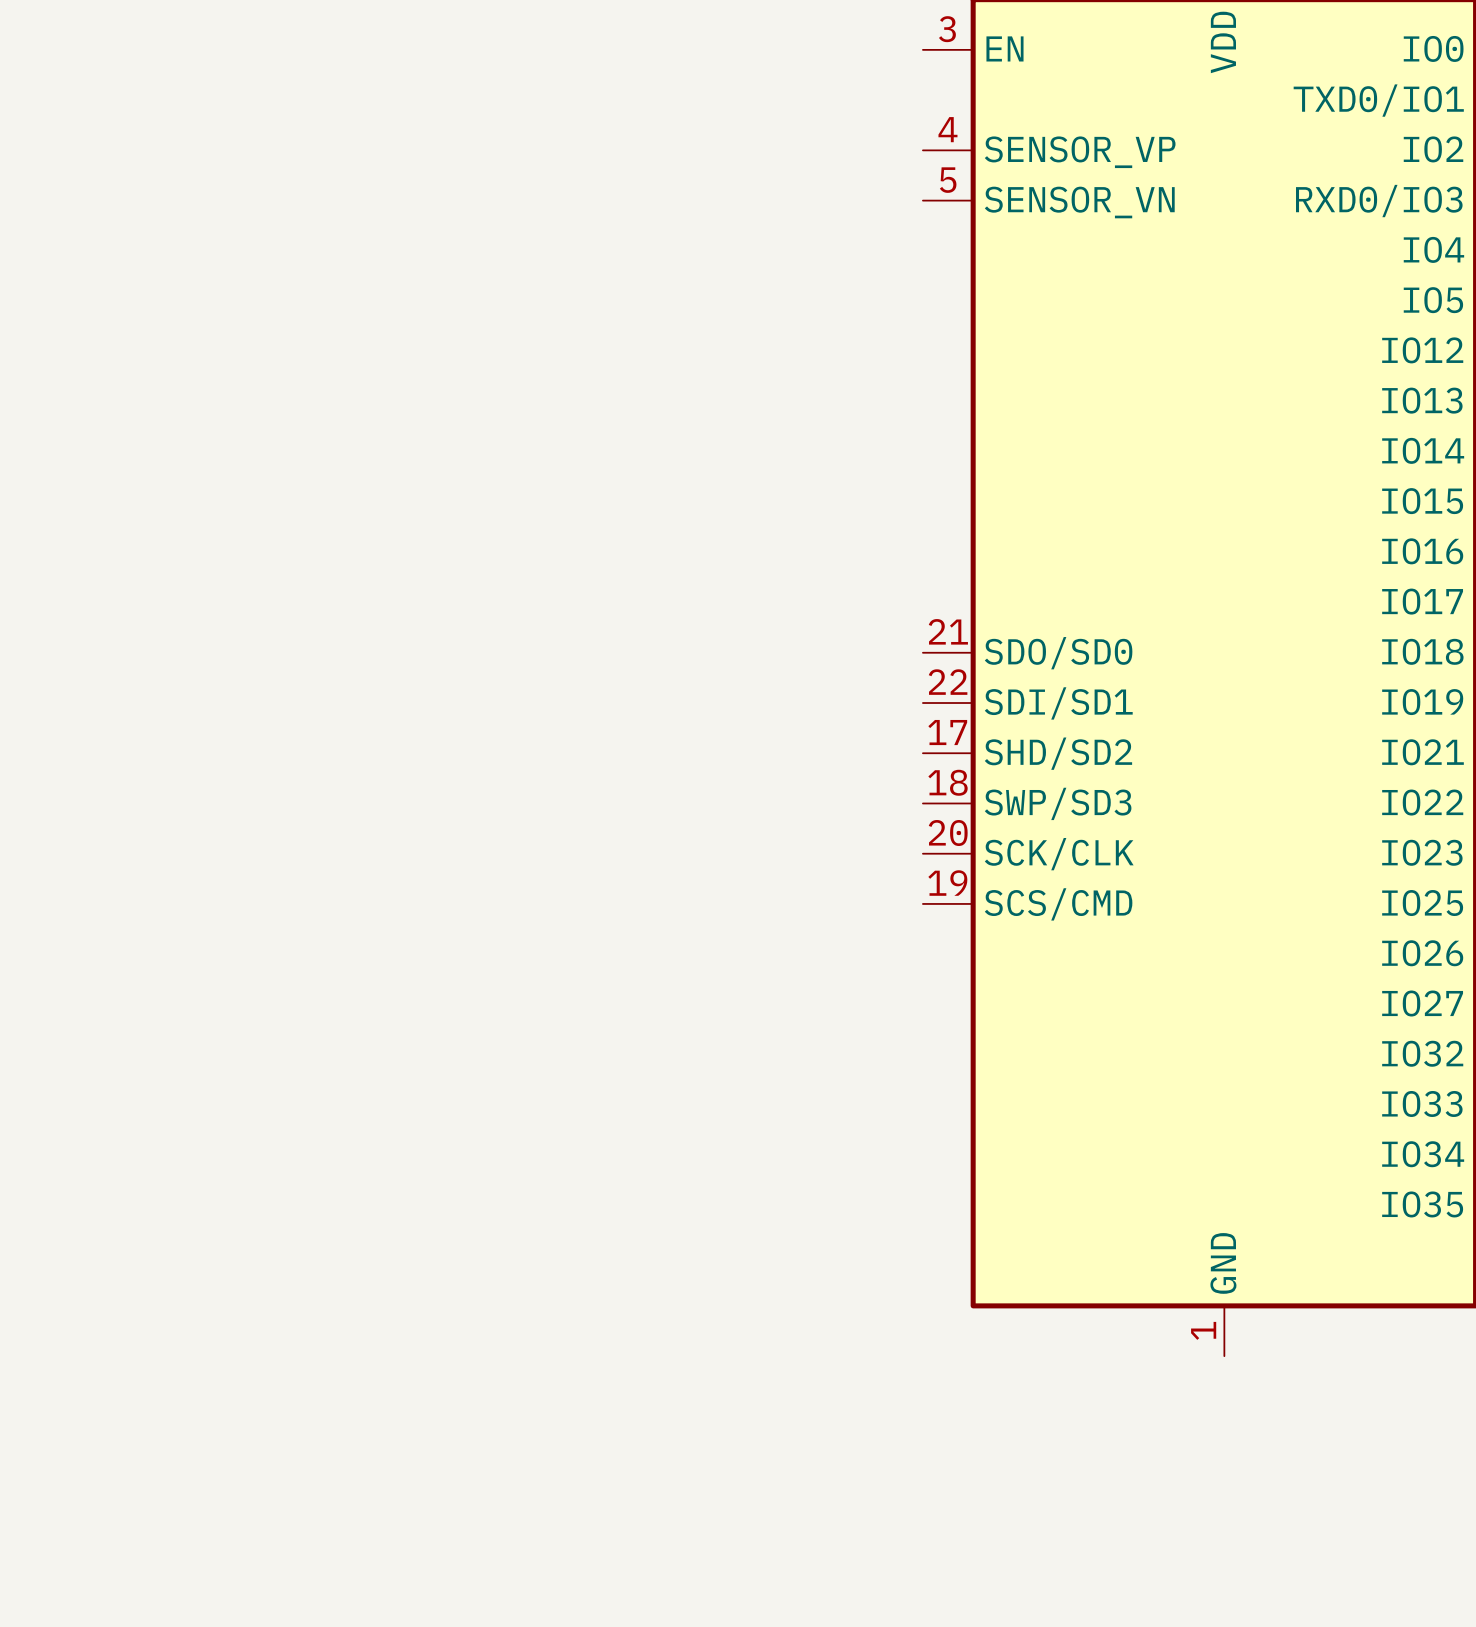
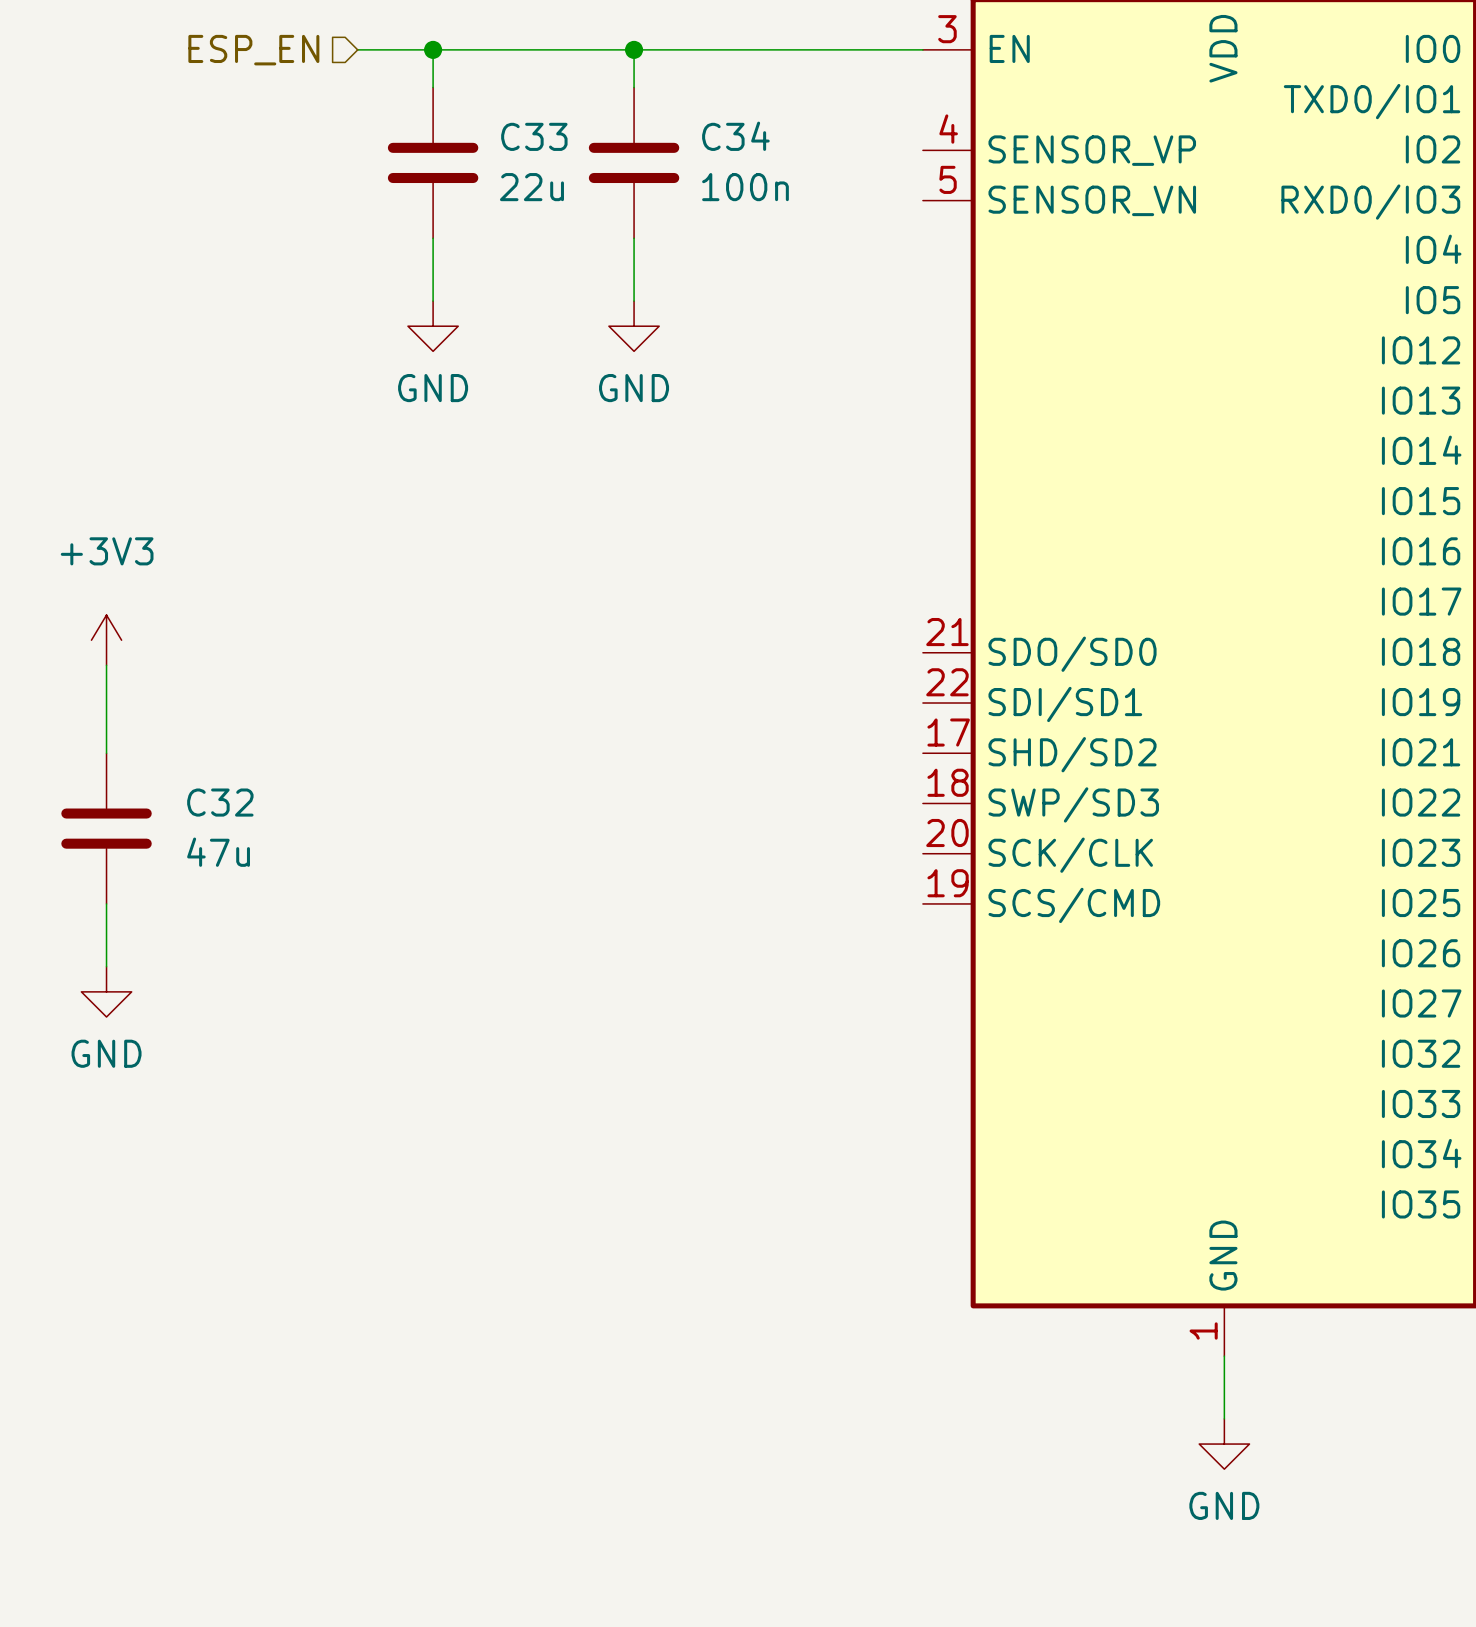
wire: none -> (357, 49) (922, 49)
wire: none -> (433, 49) (433, 87)
junction: none -> (433, 49)
wire: none -> (634, 49) (634, 87)
junction: none -> (634, 49)
hierarchical label: none -> ESP_EN (253, 50)
C33: none -> 22u (433, 162)
C34: none -> 100n (634, 162)
wire: none -> (433, 238) (433, 301)
wire: none -> (634, 238) (634, 301)
power symbol: none -> GND (433, 326)
power symbol: none -> GND (634, 326)
power symbol: none -> +3V3 (106, 640)
wire: none -> (106, 665) (106, 753)
C32: none -> 47u (106, 828)
wire: none -> (106, 903) (106, 966)
power symbol: none -> GND (106, 991)
wire: none -> (1224, 1356) (1224, 1418)
power symbol: none -> GND (1224, 1444)

